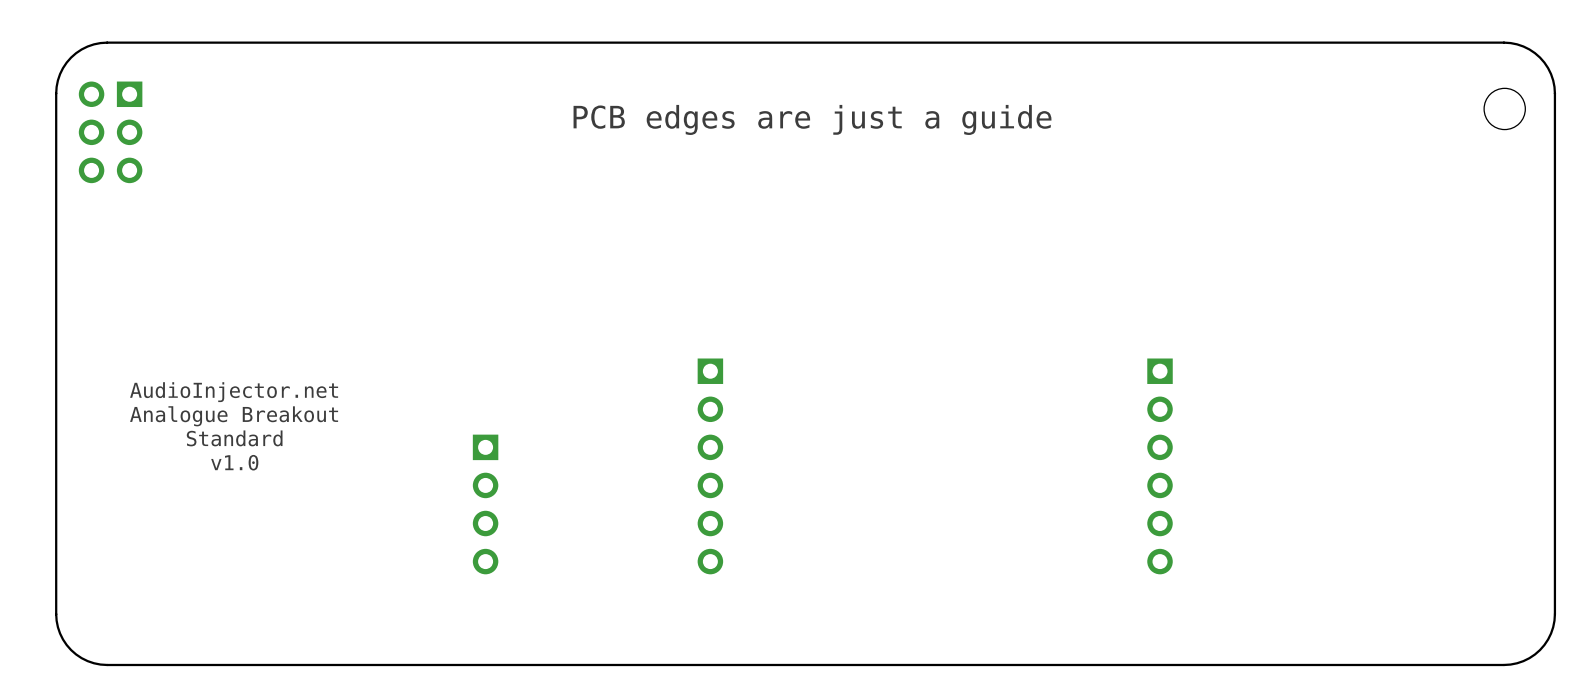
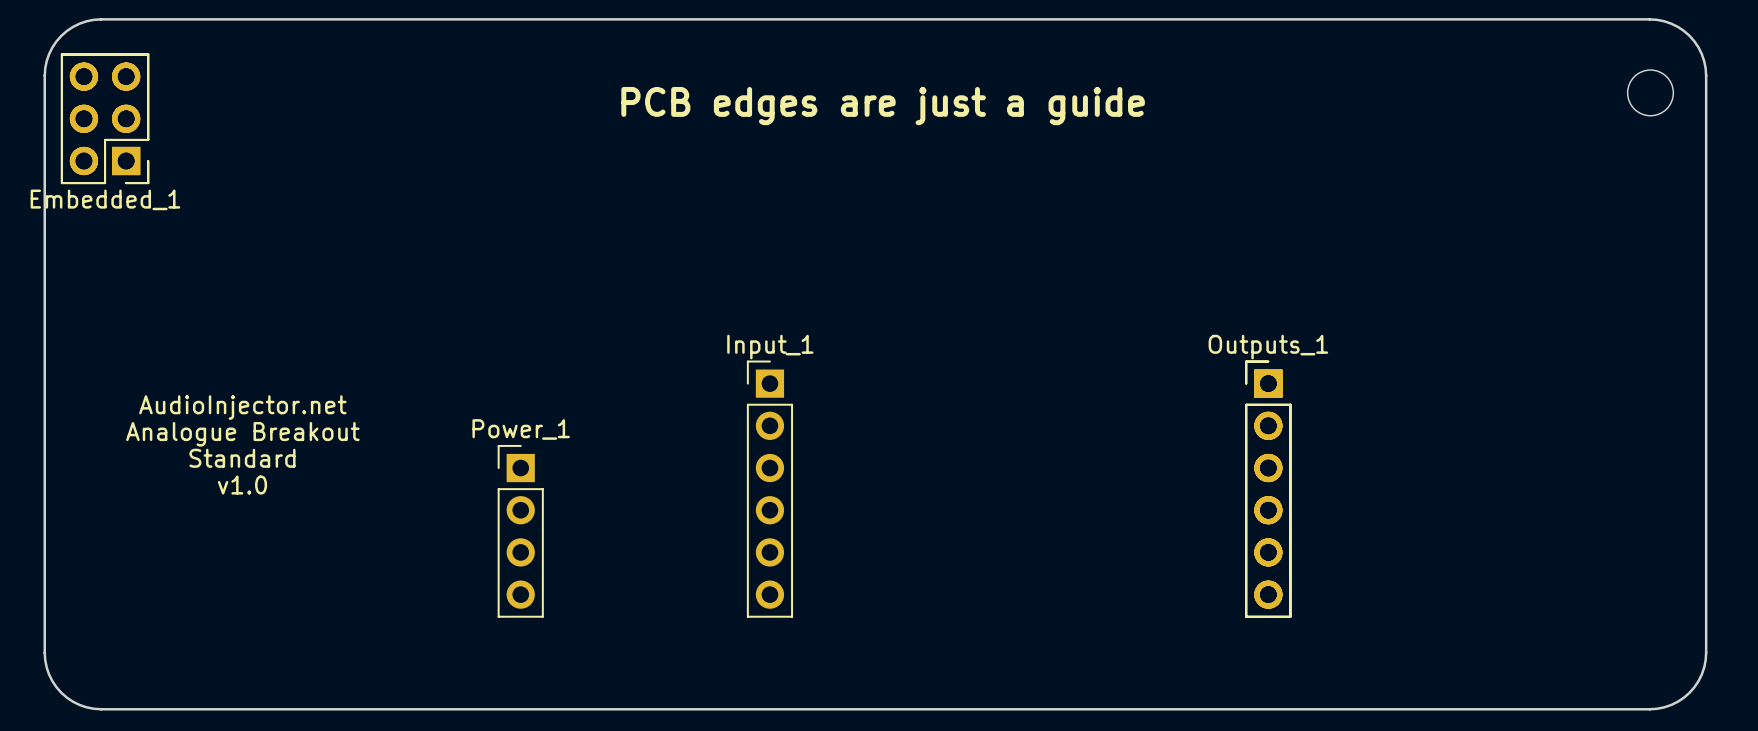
part side: bottom (110, 132) -> top (105, 118)
Embedded_1: none -> (105, 118)
Input_1 side: bottom (710, 466) -> top (769, 489)
part side: bottom (1160, 466) -> top (1268, 489)
Outputs_1: none -> (1268, 489)
Power_1 side: bottom (485, 504) -> top (520, 531)

